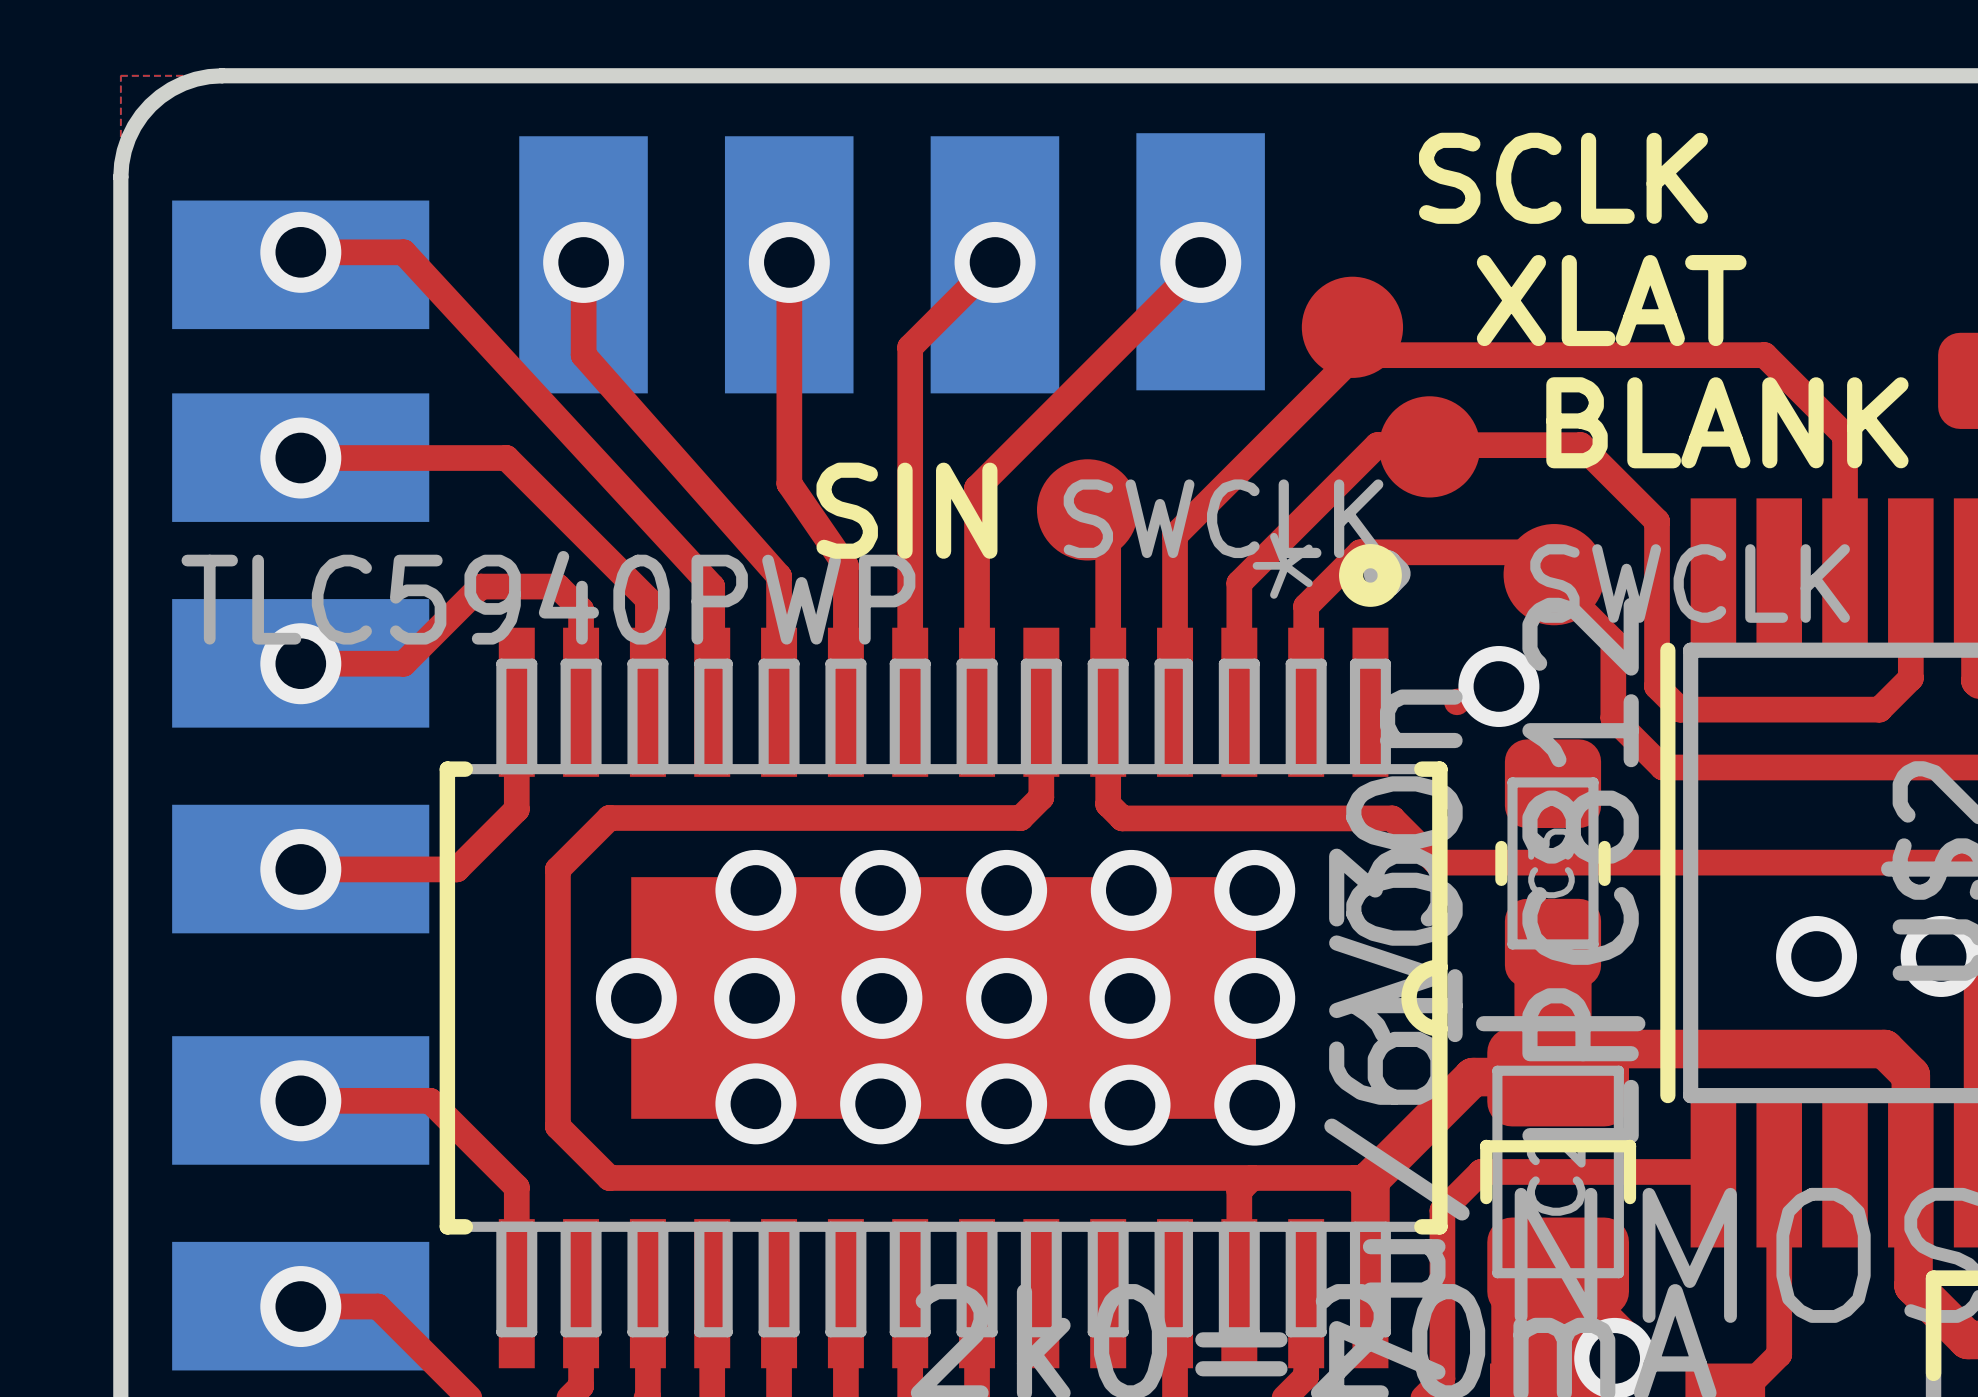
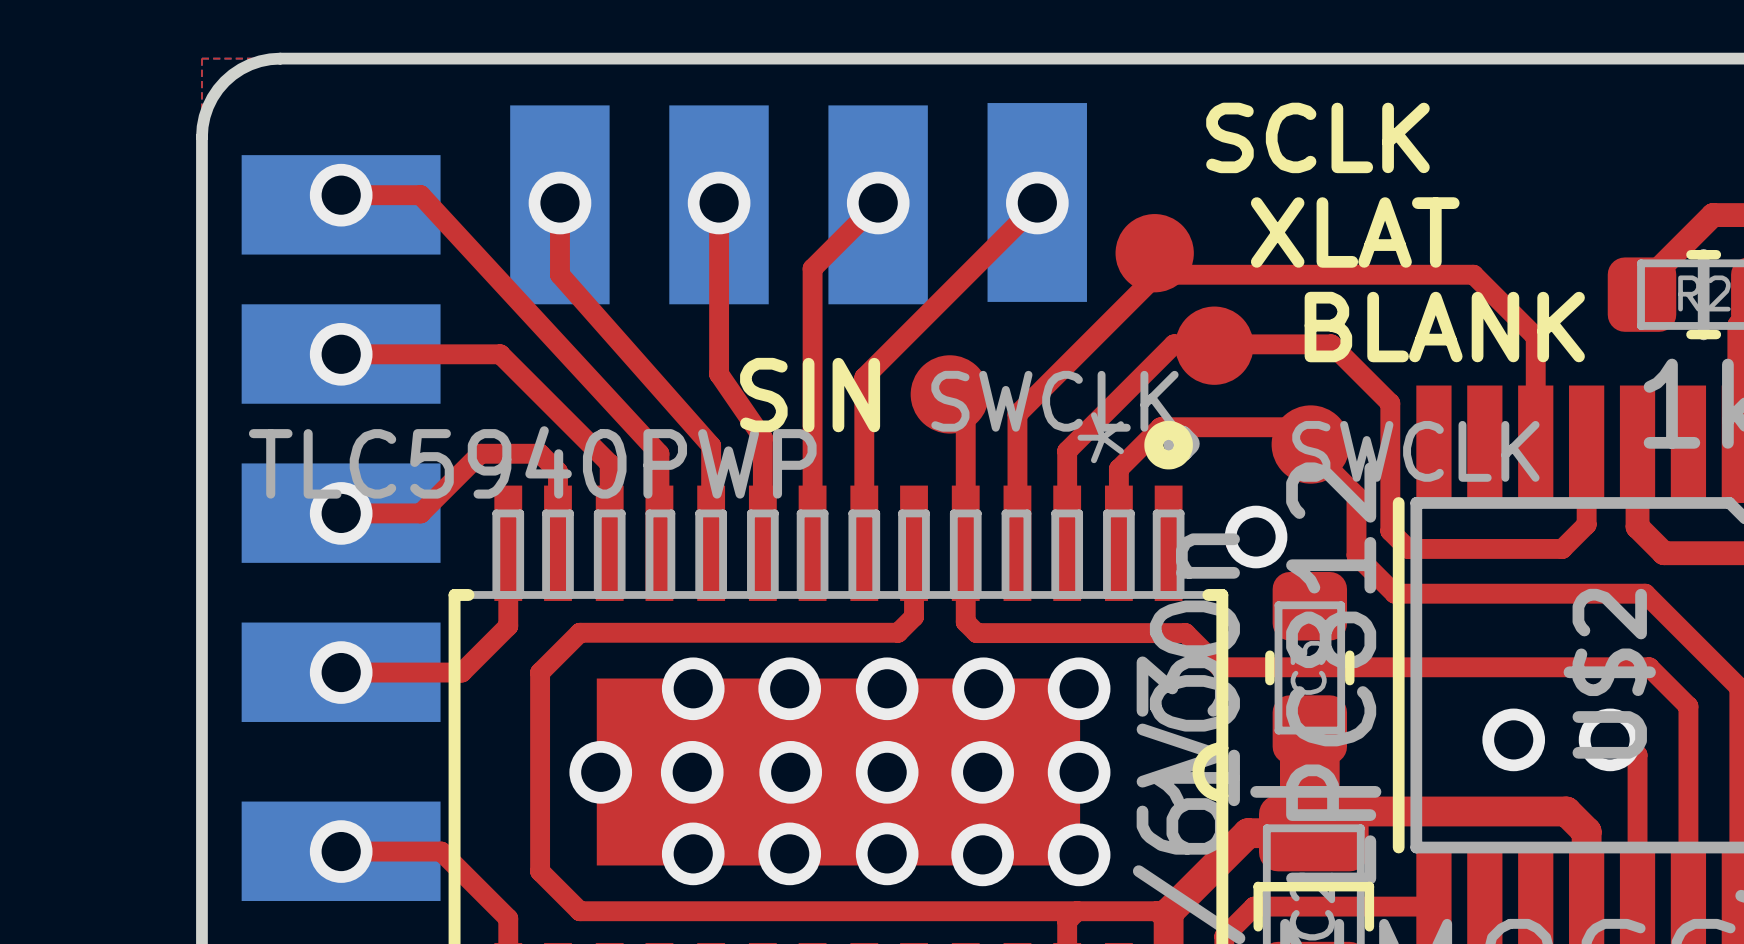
via position: (1498, 686) -> (1256, 537)

